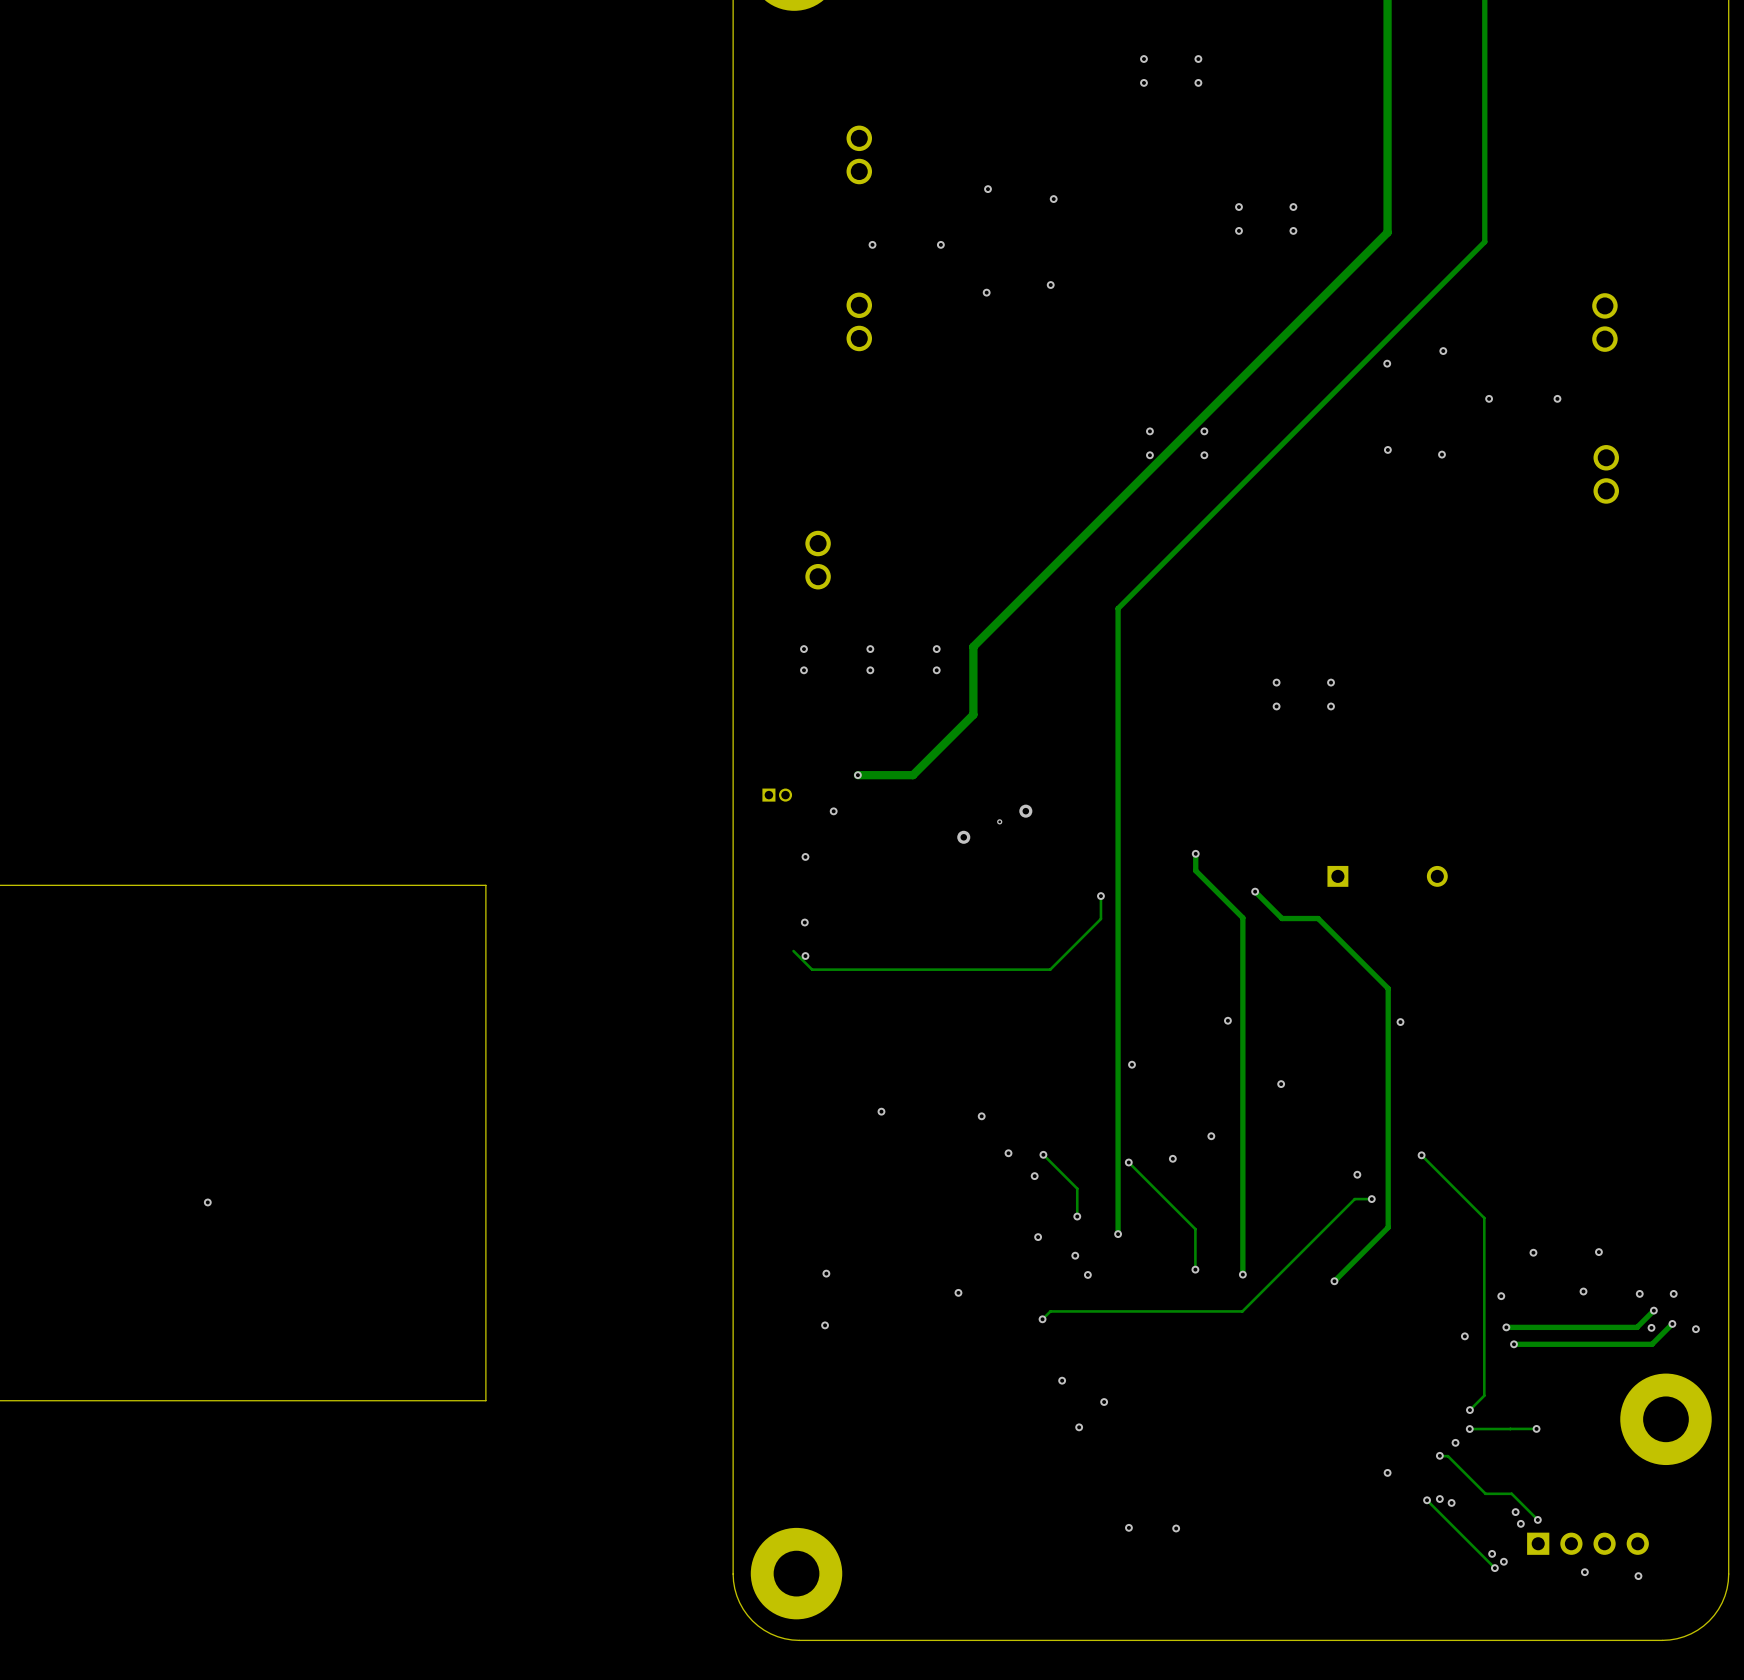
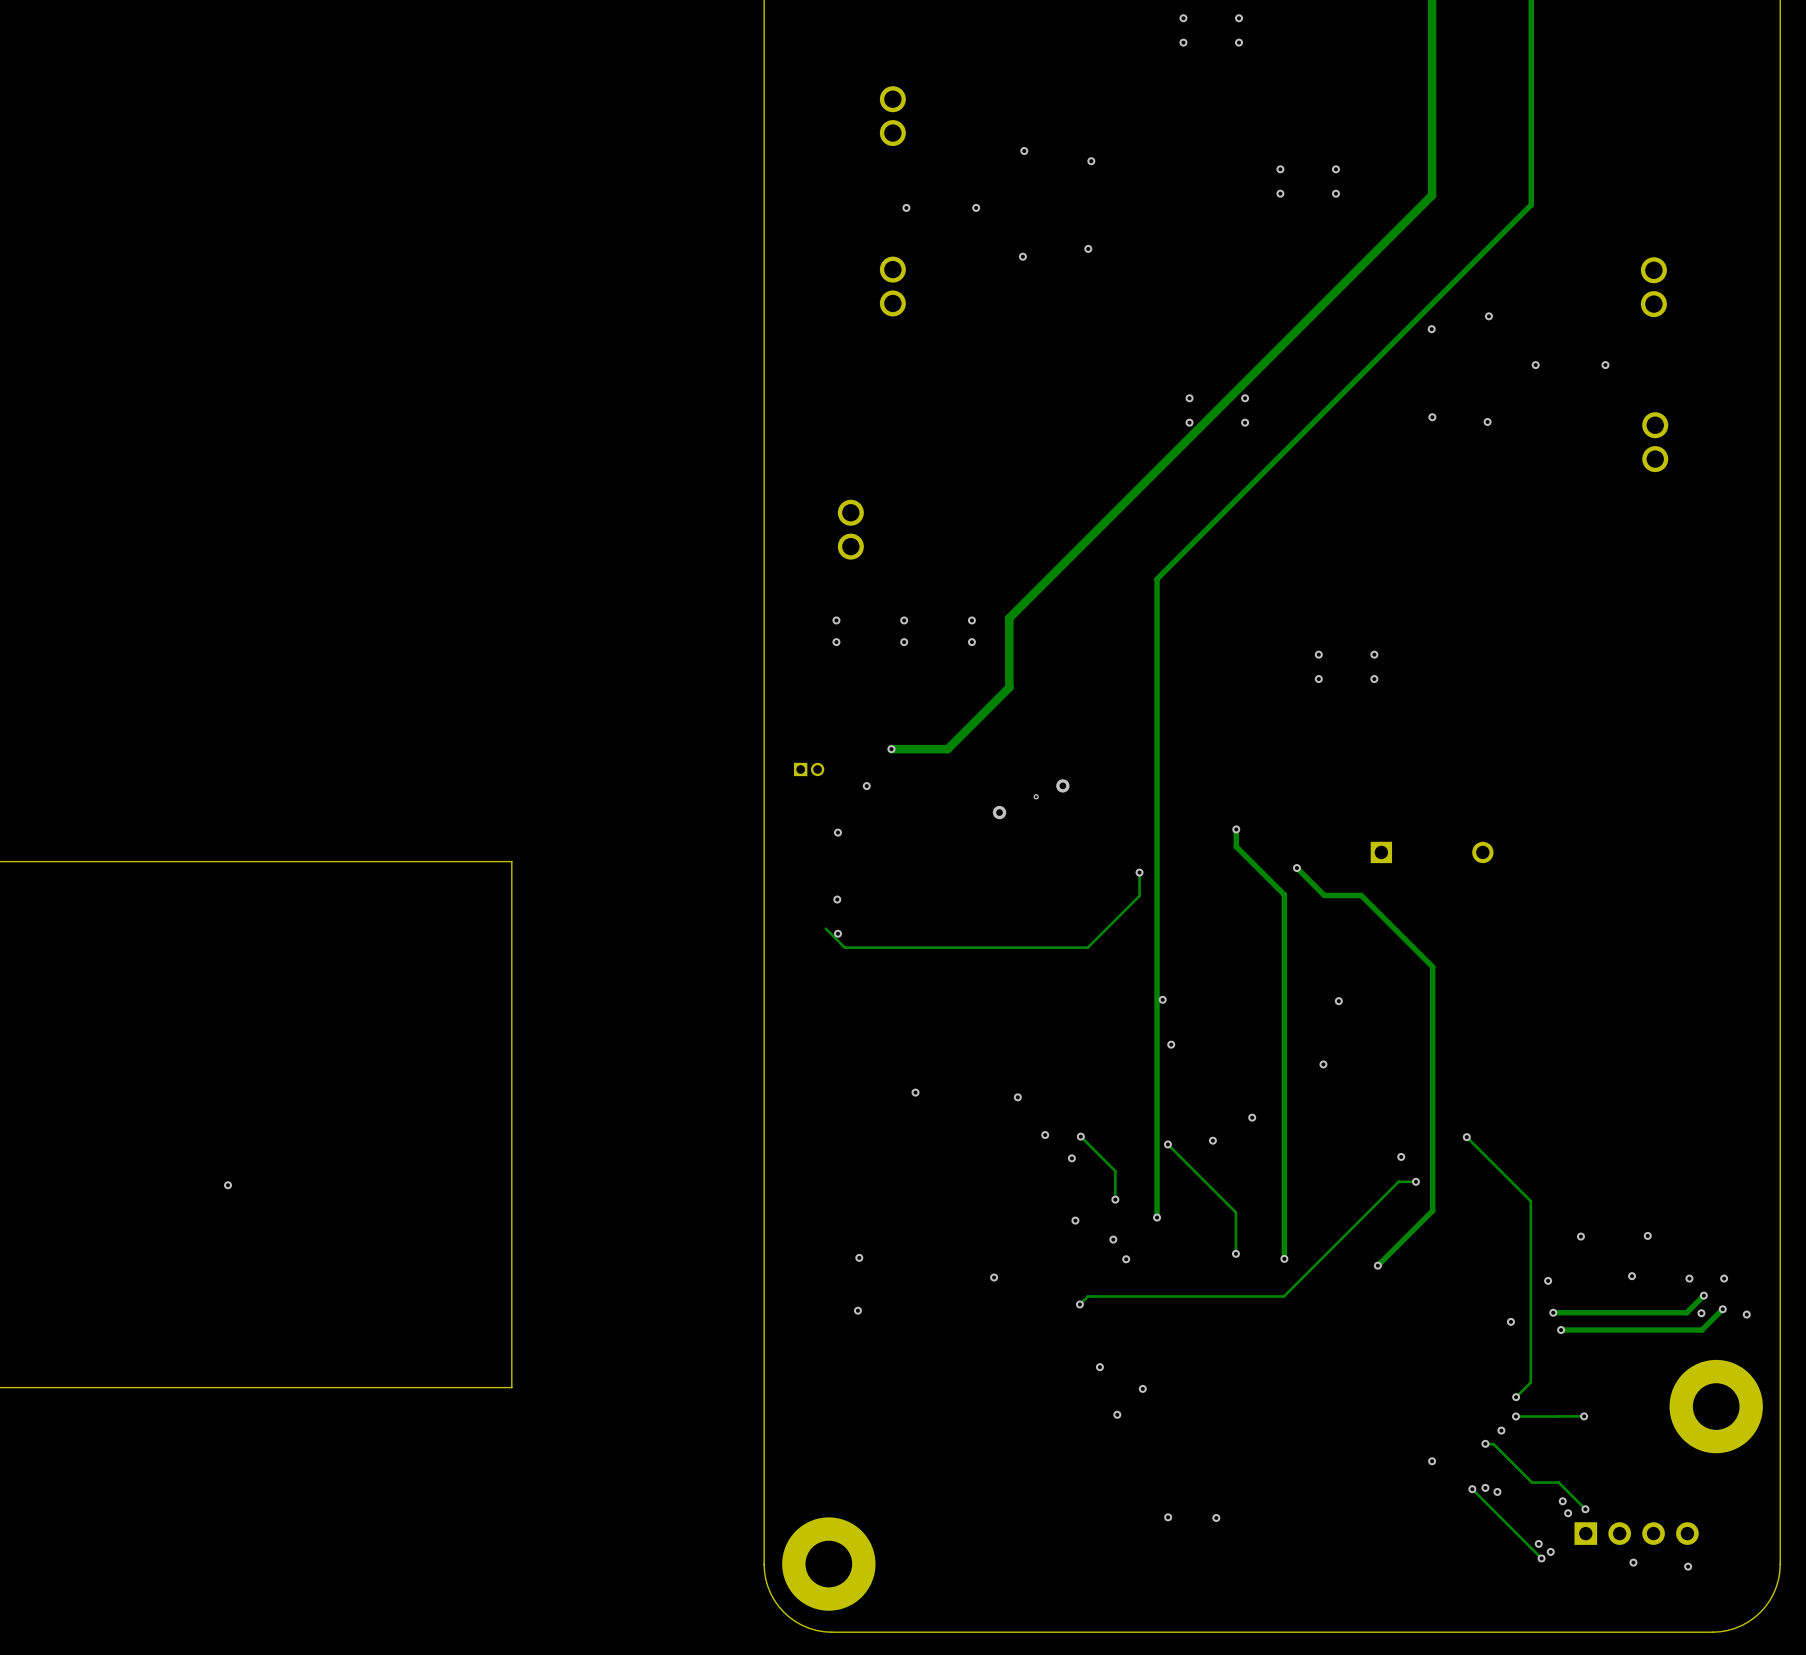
via: none -> (1162, 999)
via: (1227, 1020) -> none
via: none -> (1338, 1001)
via: (1400, 1022) -> none

